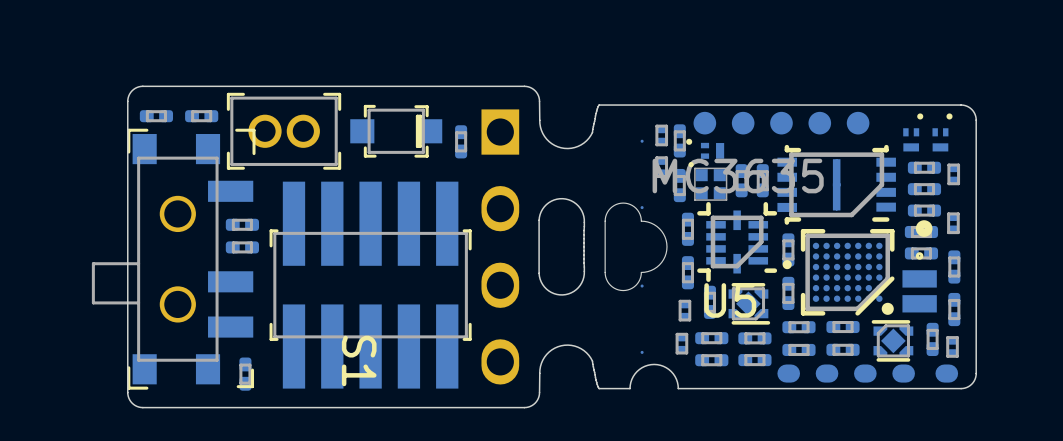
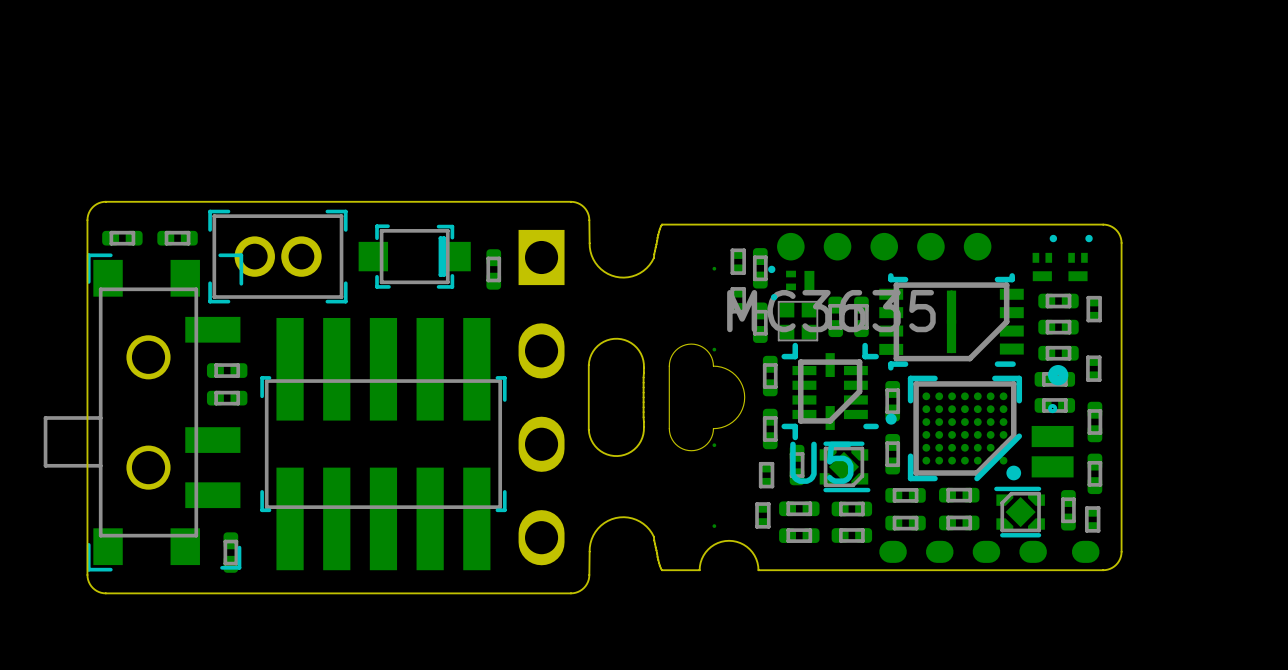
S1 name: S1 (359, 360) -> none

